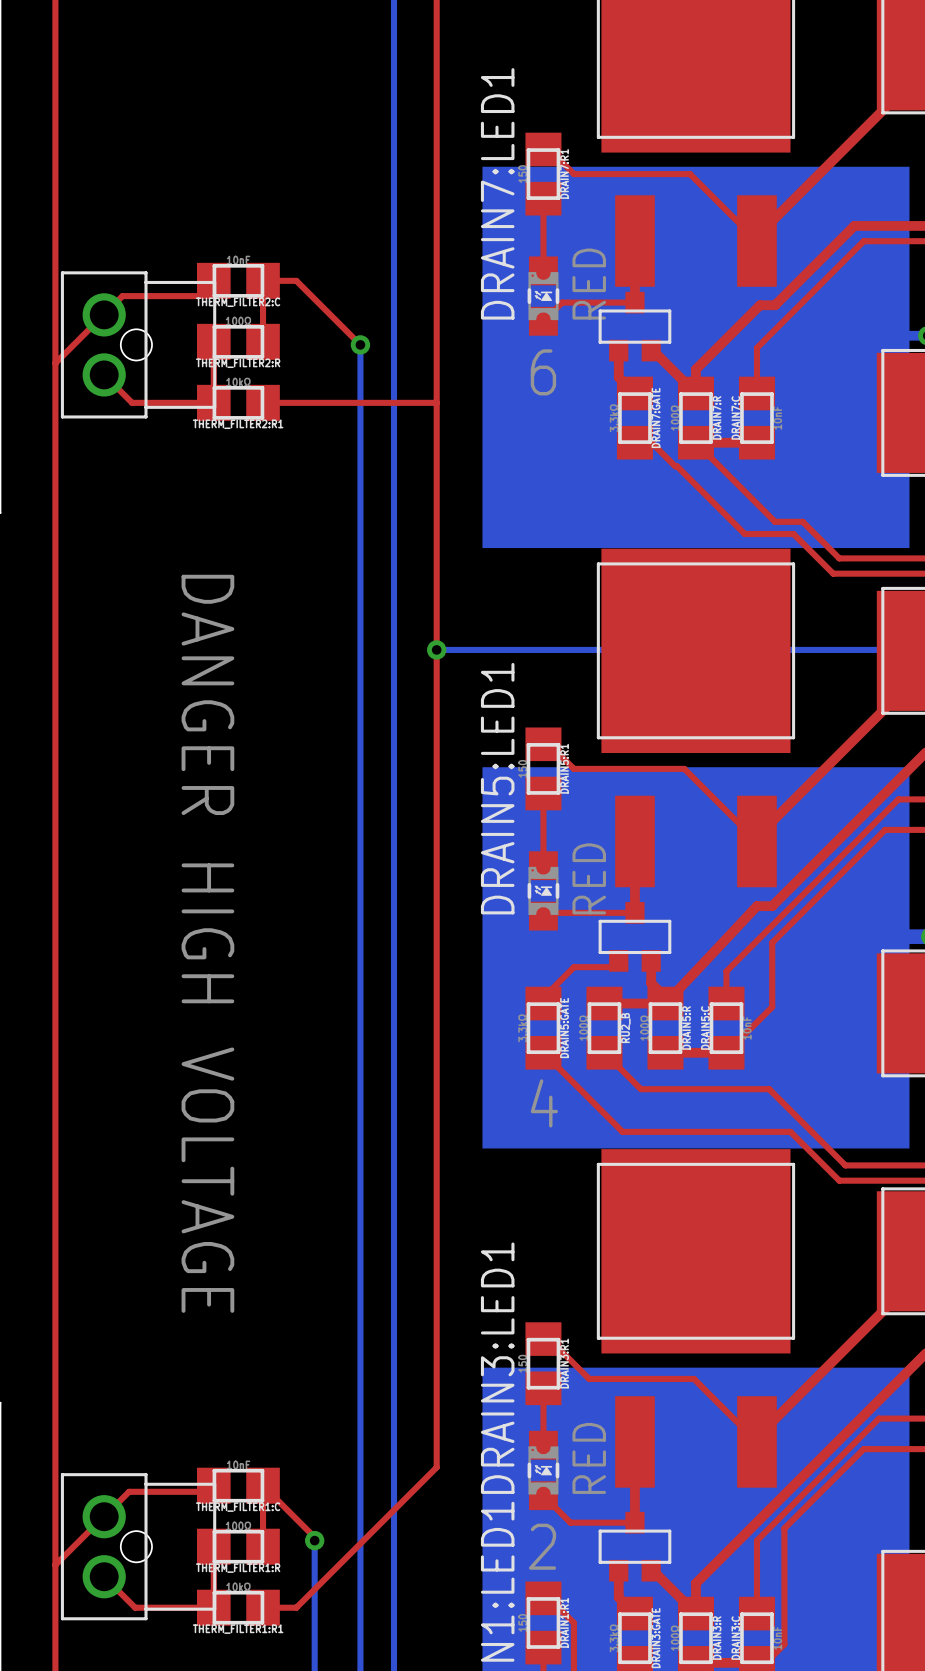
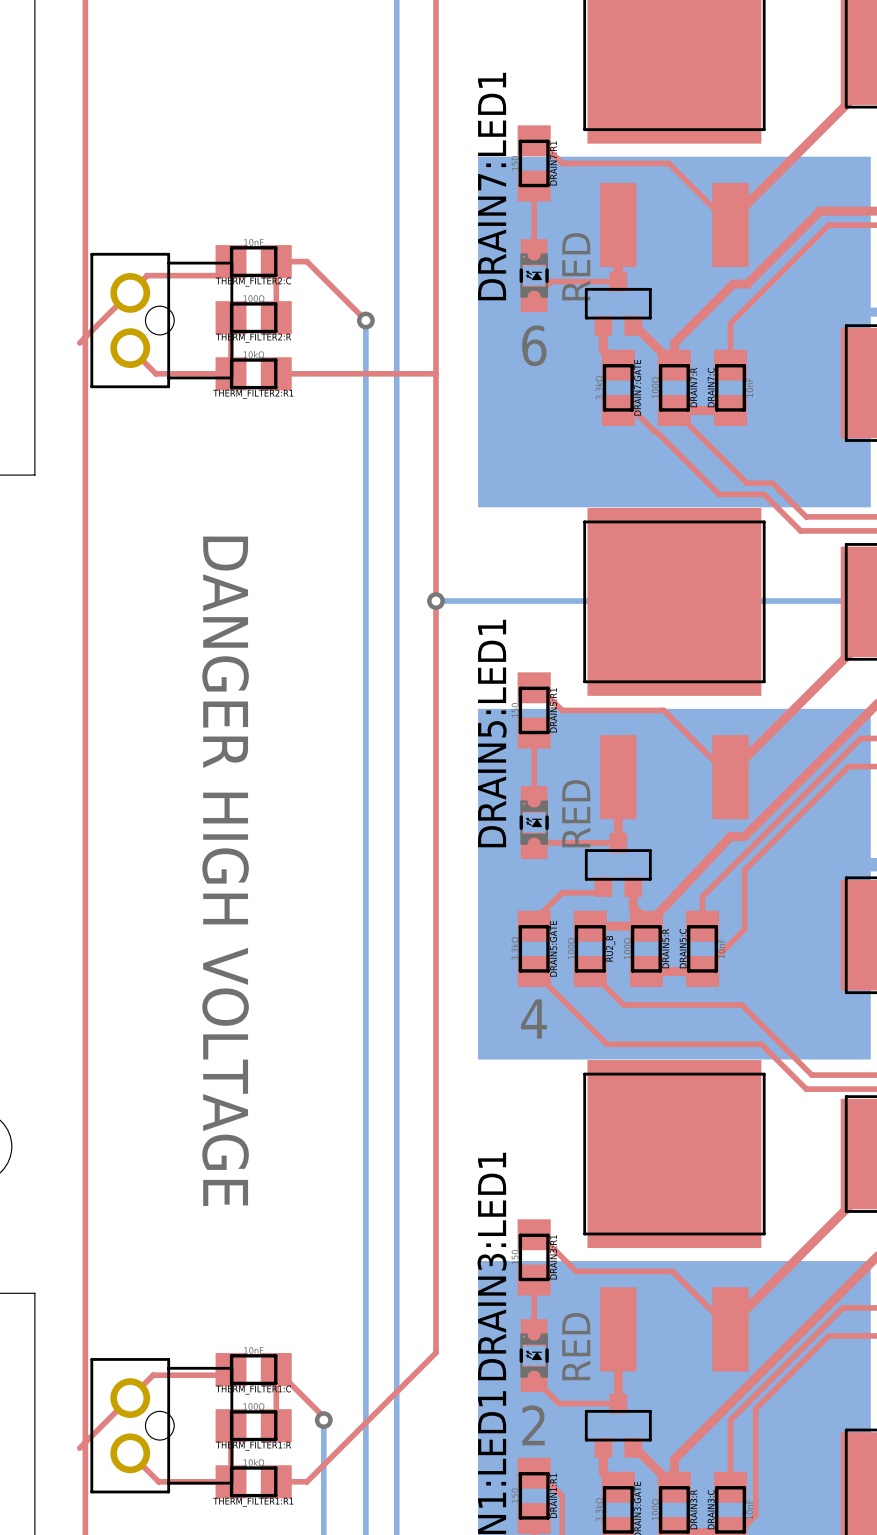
top track: none -> (85, 337) (79, 342)
top track: none -> (85, 1442) (79, 1448)

